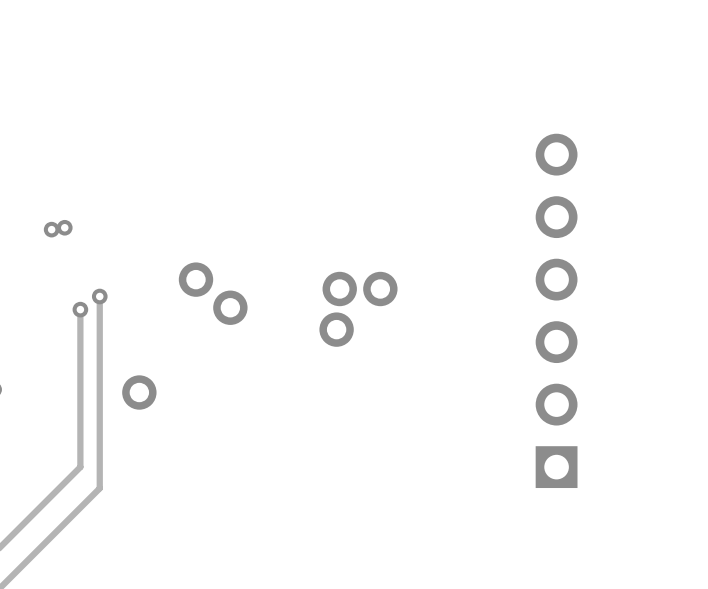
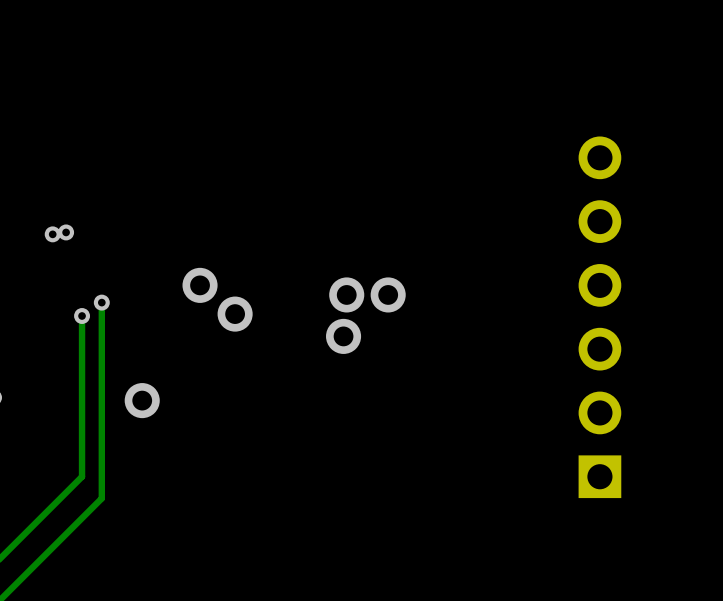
part position: (556, 310) -> (599, 317)

